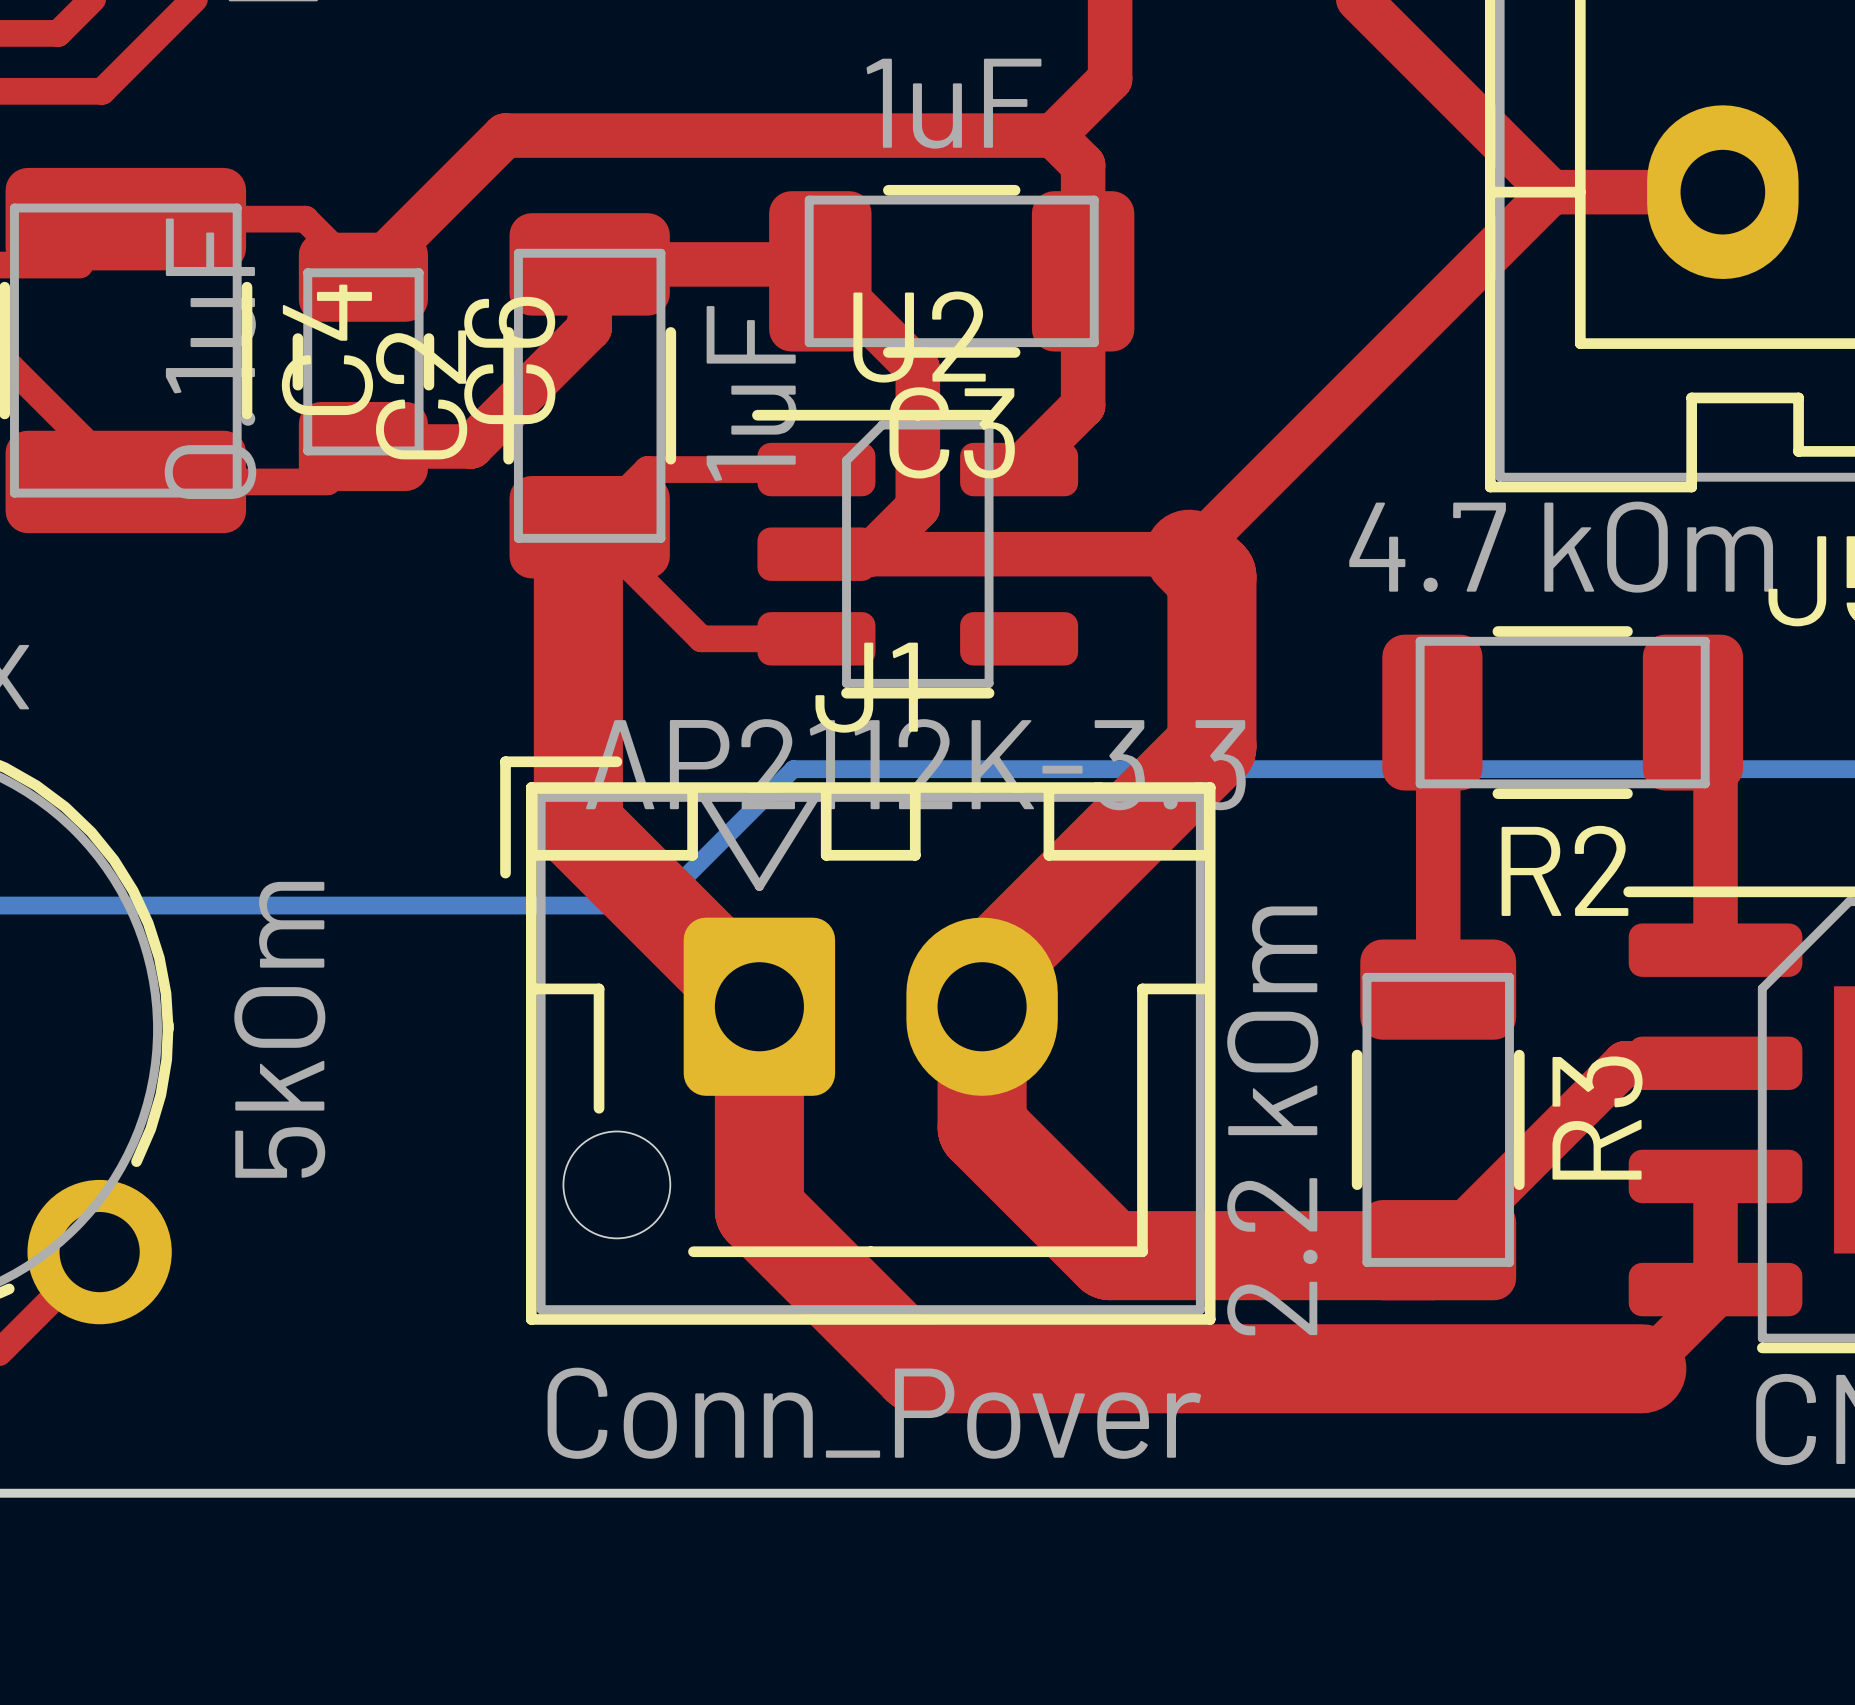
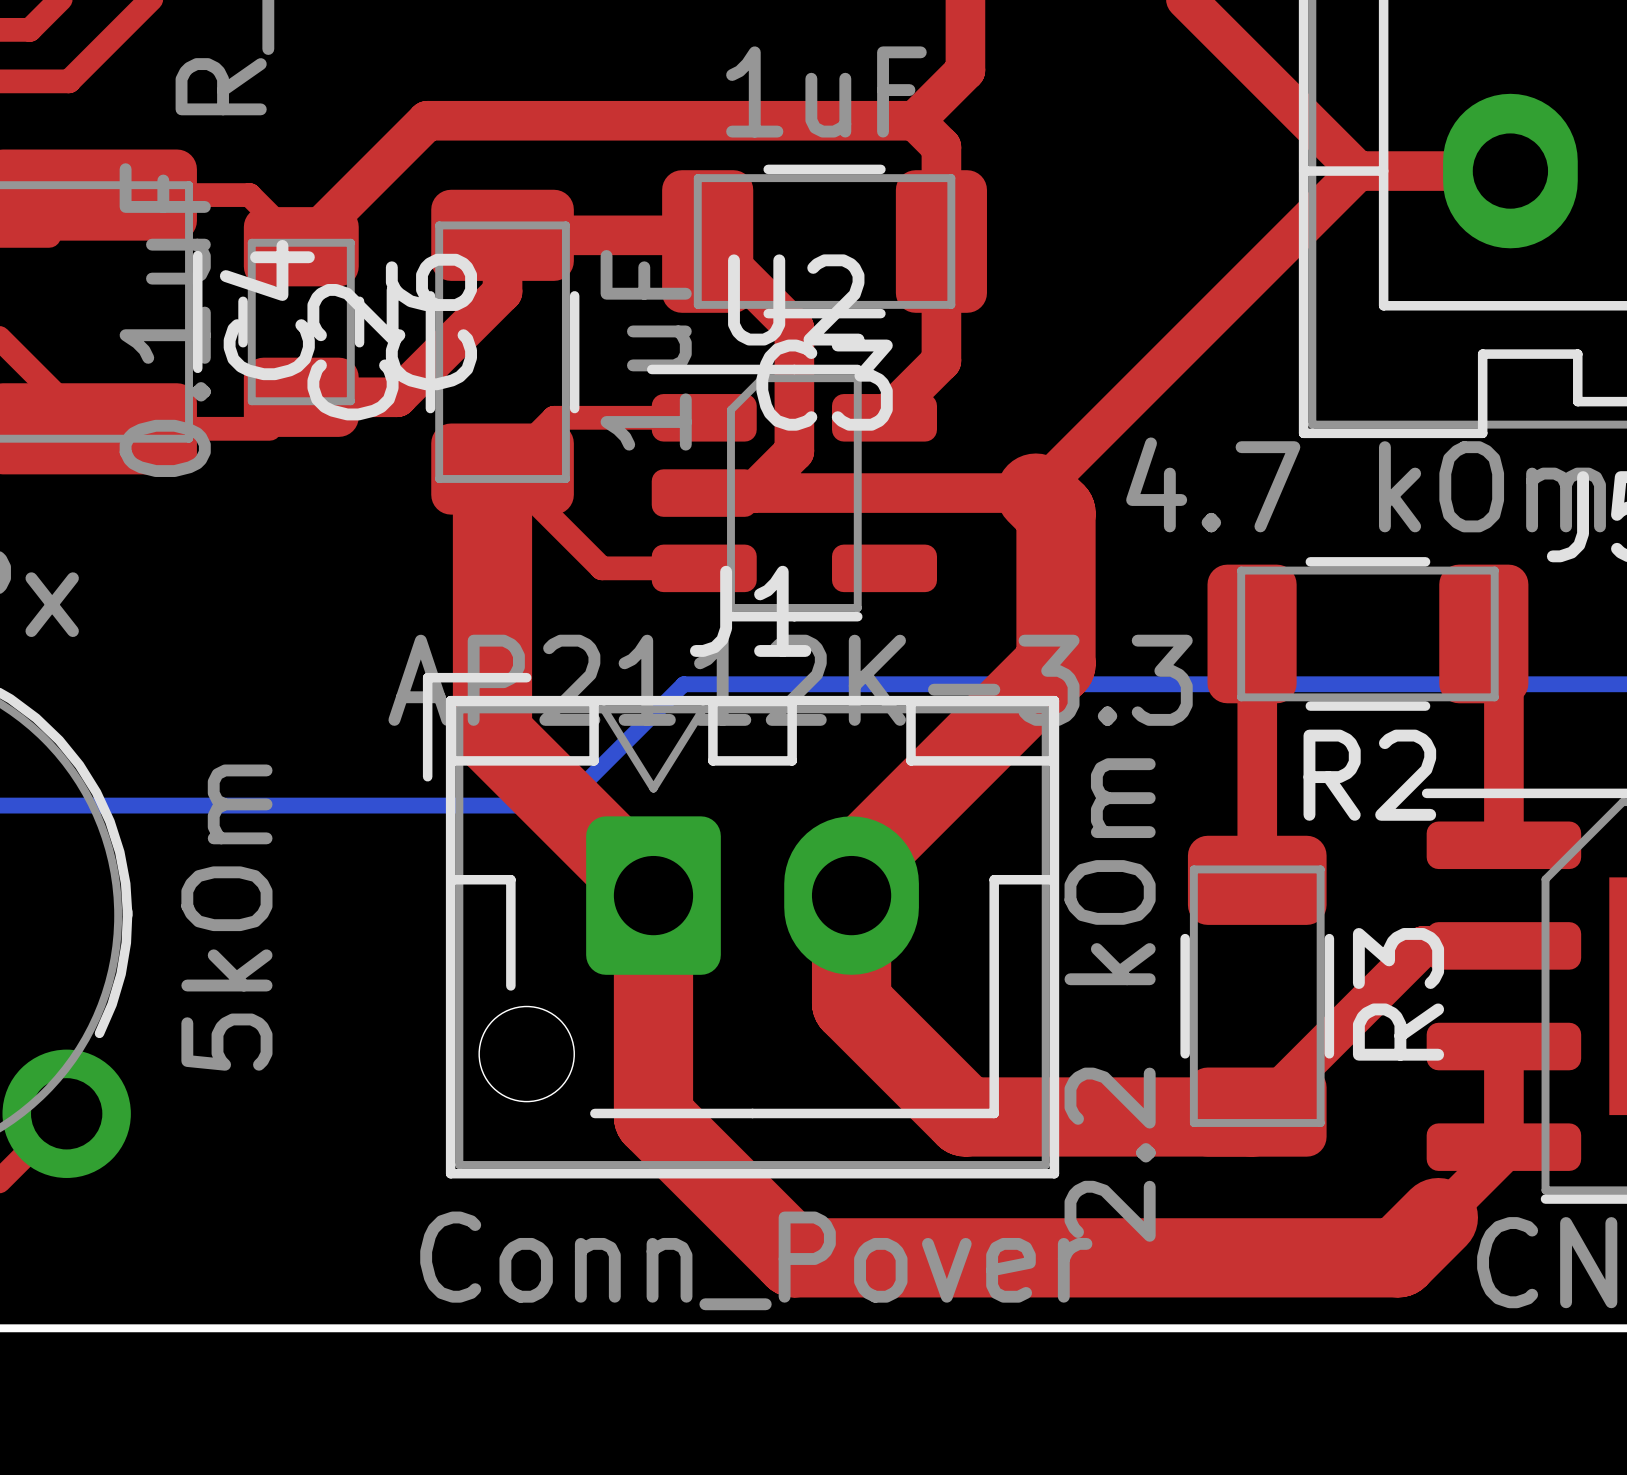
top track: (759, 1210) (917, 1368) (1641, 1368) -> (653, 1076) (653, 1116) (794, 1257) (1398, 1257) (1438, 1217)

